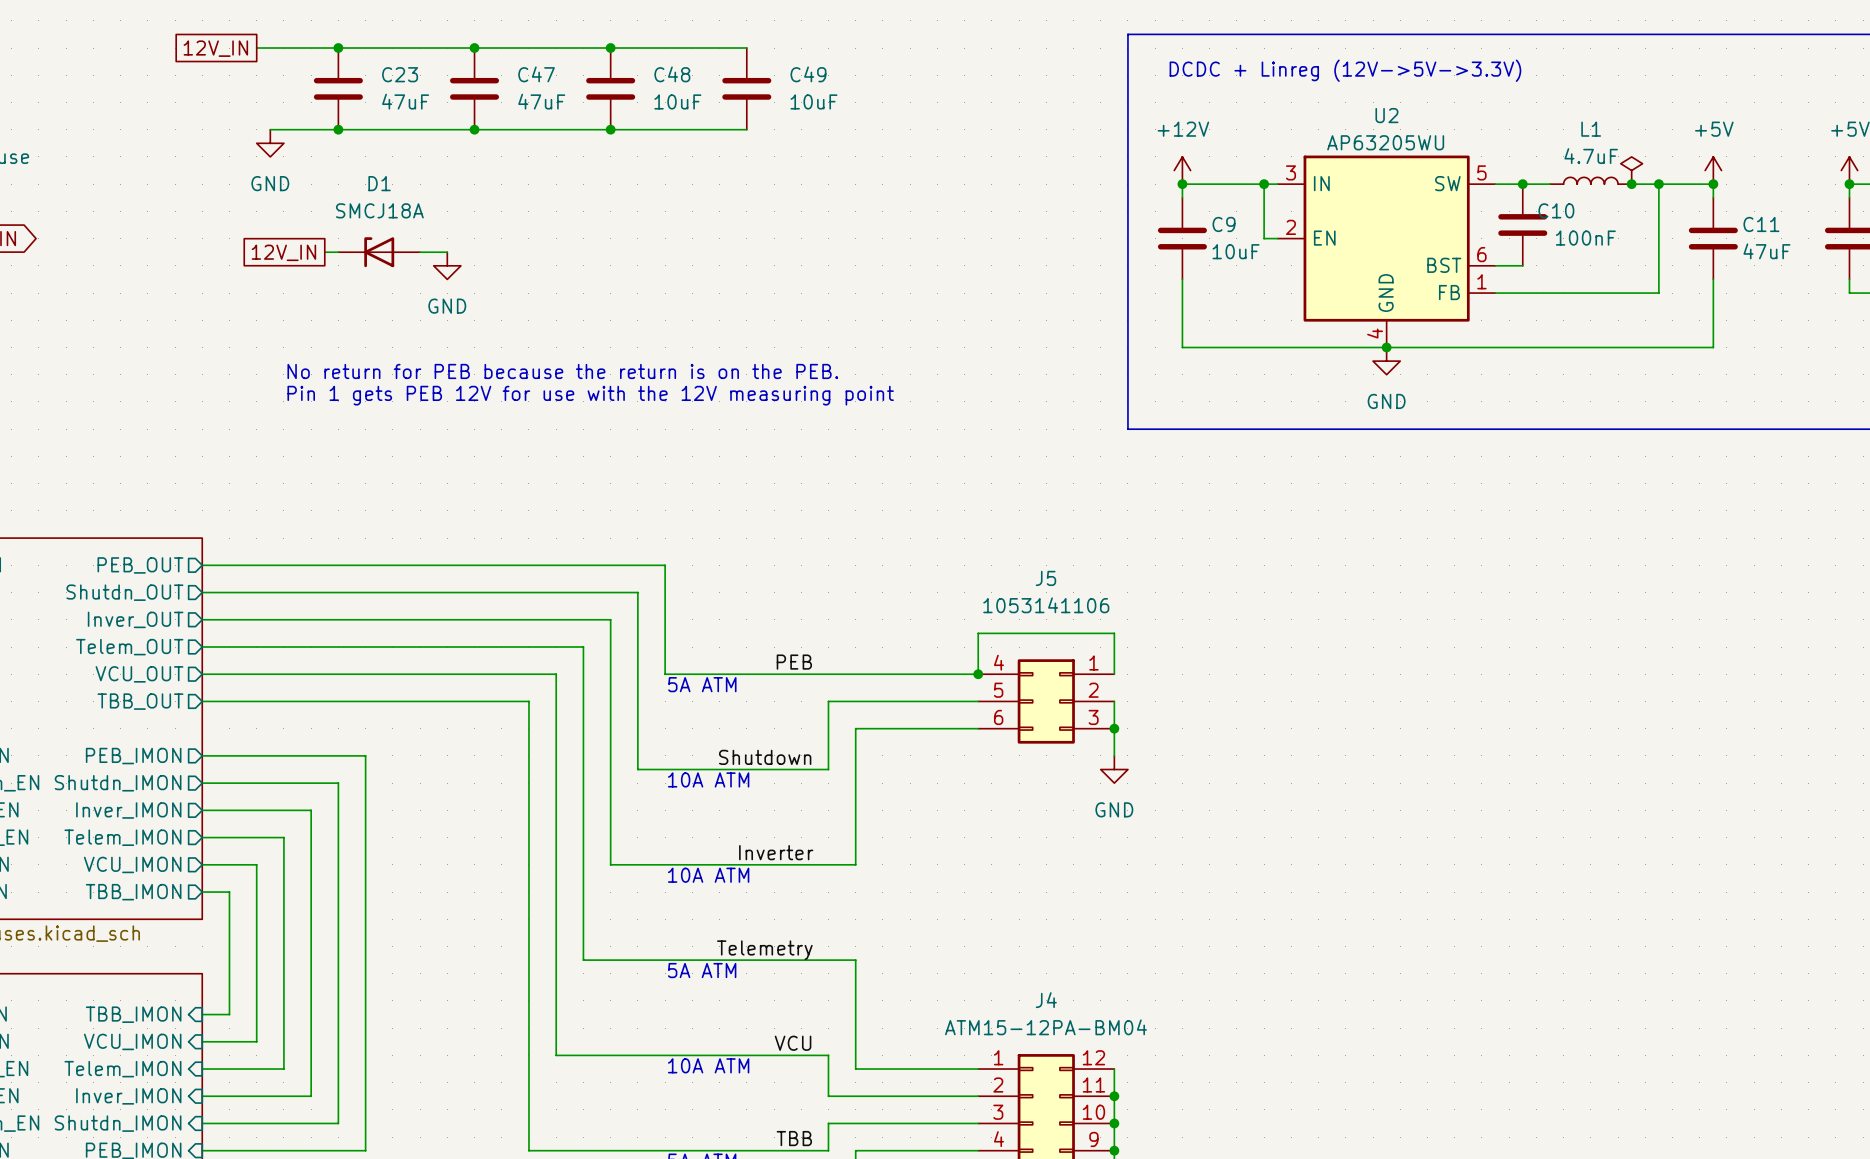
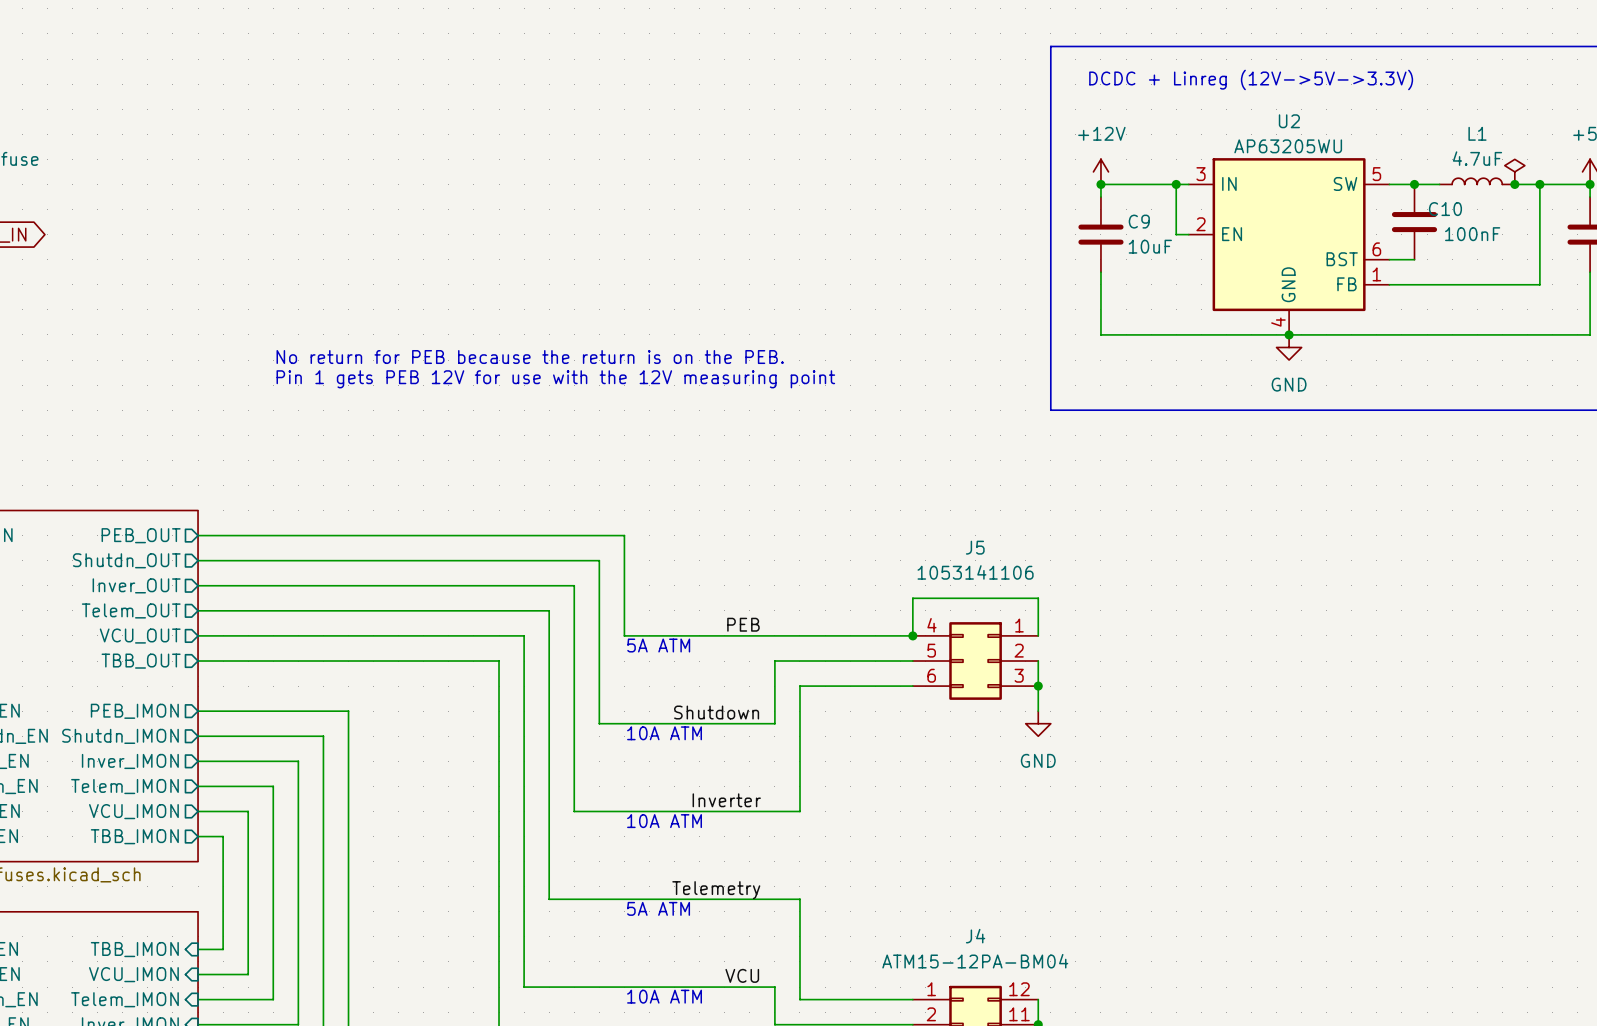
global label: 12V_IN (215, 48) -> none
wire: (256, 48) (746, 48) -> none
junction: (338, 48) -> none
junction: (474, 48) -> none
junction: (610, 48) -> none
C23: 47uF (338, 88) -> none
C47: 47uF (474, 88) -> none
C48: 10uF (610, 88) -> none
C49: 10uF (746, 88) -> none
wire: (270, 129) (746, 129) -> none
junction: (338, 129) -> none
junction: (474, 129) -> none
junction: (610, 129) -> none
power symbol: GND (270, 143) -> none
global label: 12V_IN (283, 252) -> none
wire: (324, 252) (338, 252) -> none
D1: SMCJ18A (379, 252) -> none
wire: (420, 252) (447, 252) -> none
power symbol: GND (447, 265) -> none

